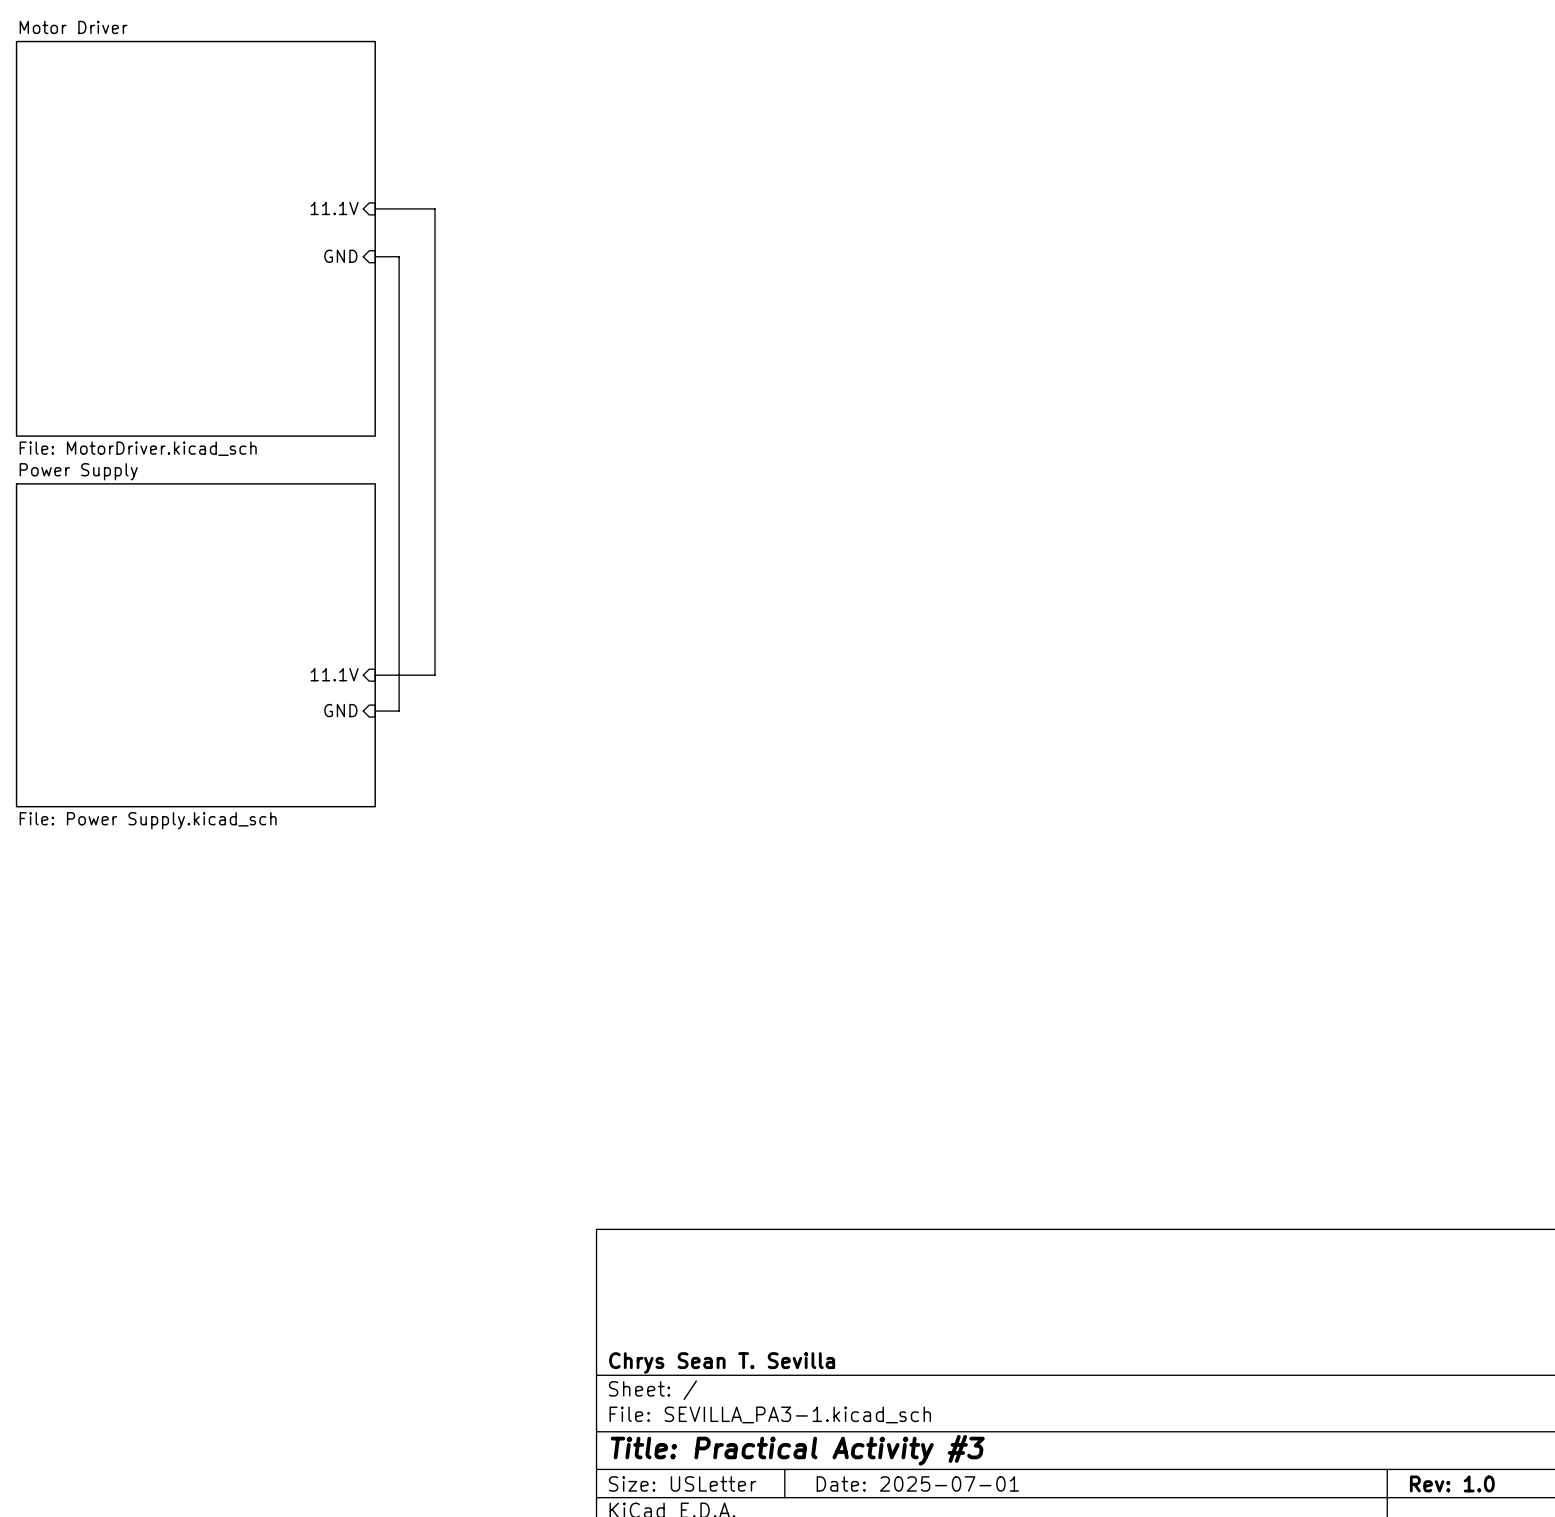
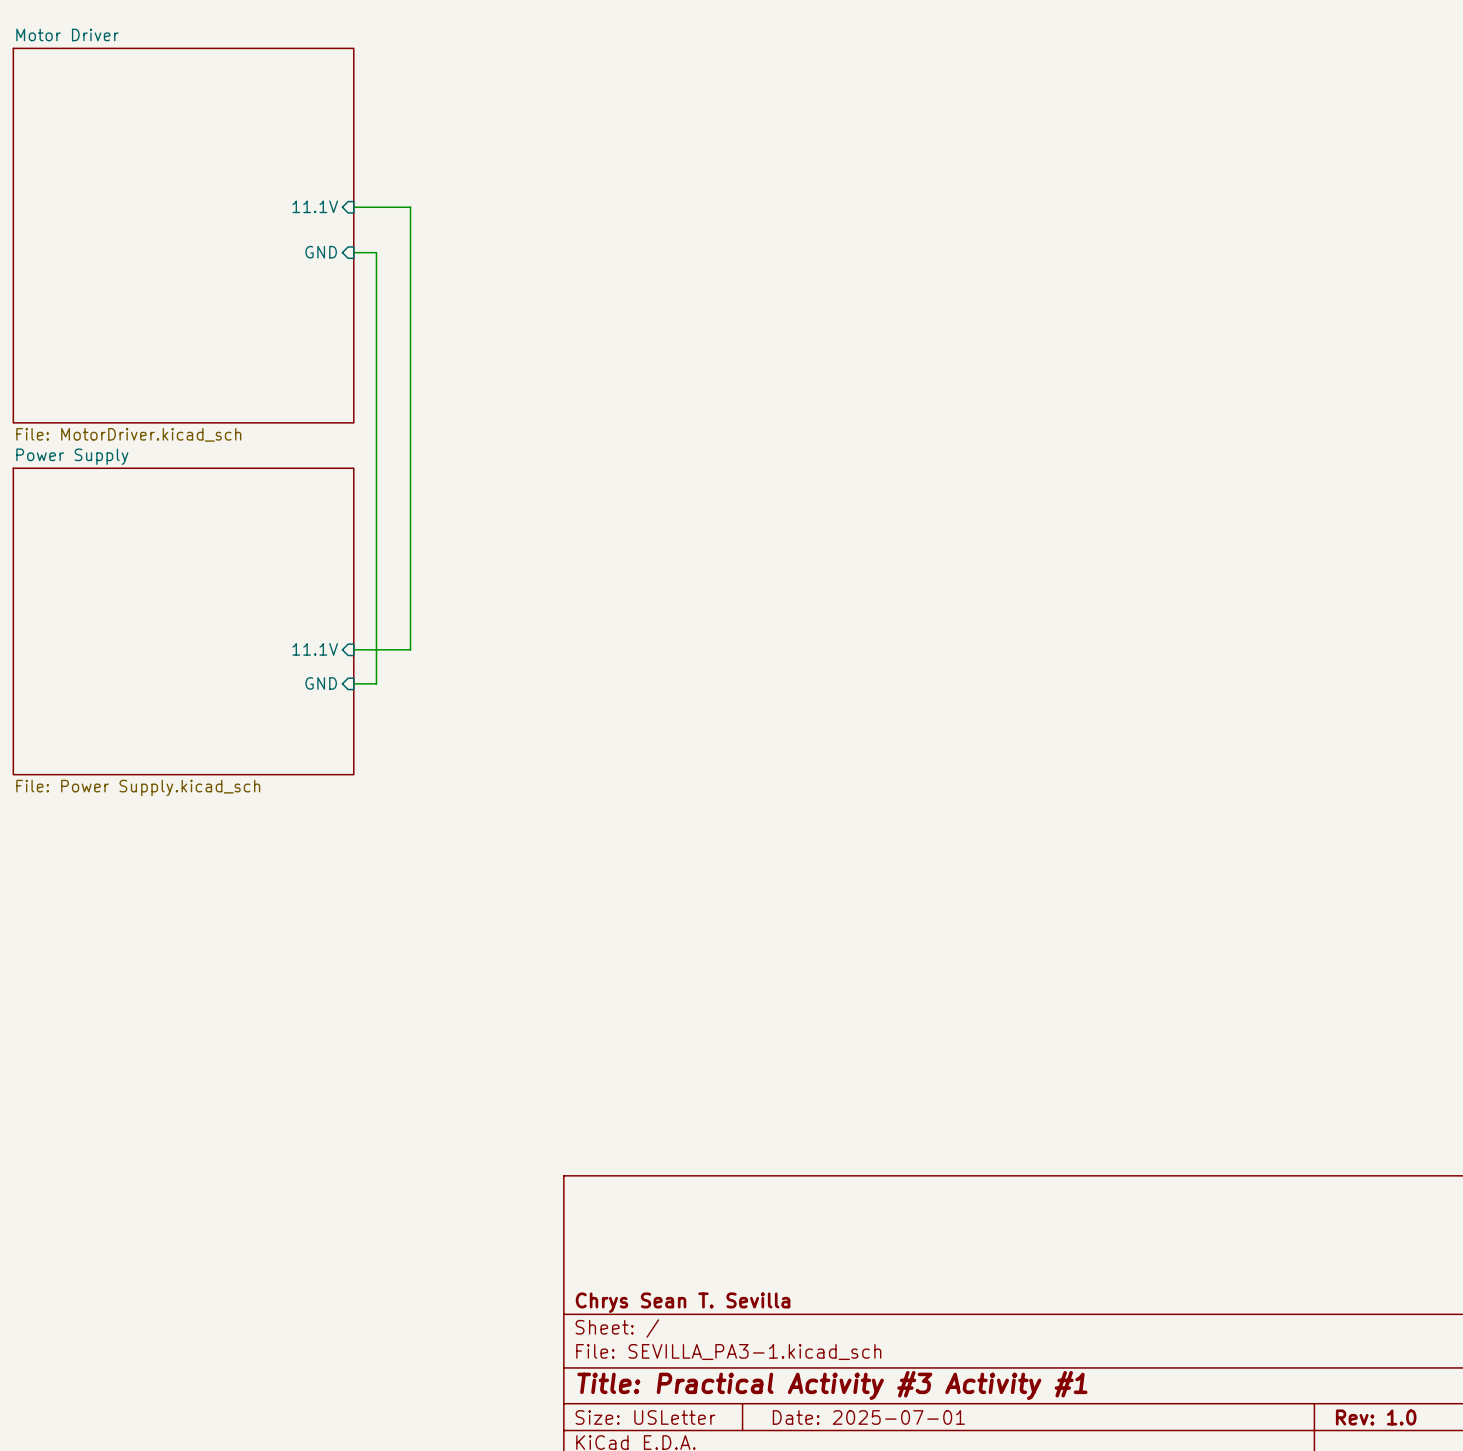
title block: Title: Practical Activity #3 (797, 1450) -> Title: Practical Activity #3 Activity #1 (832, 1385)

